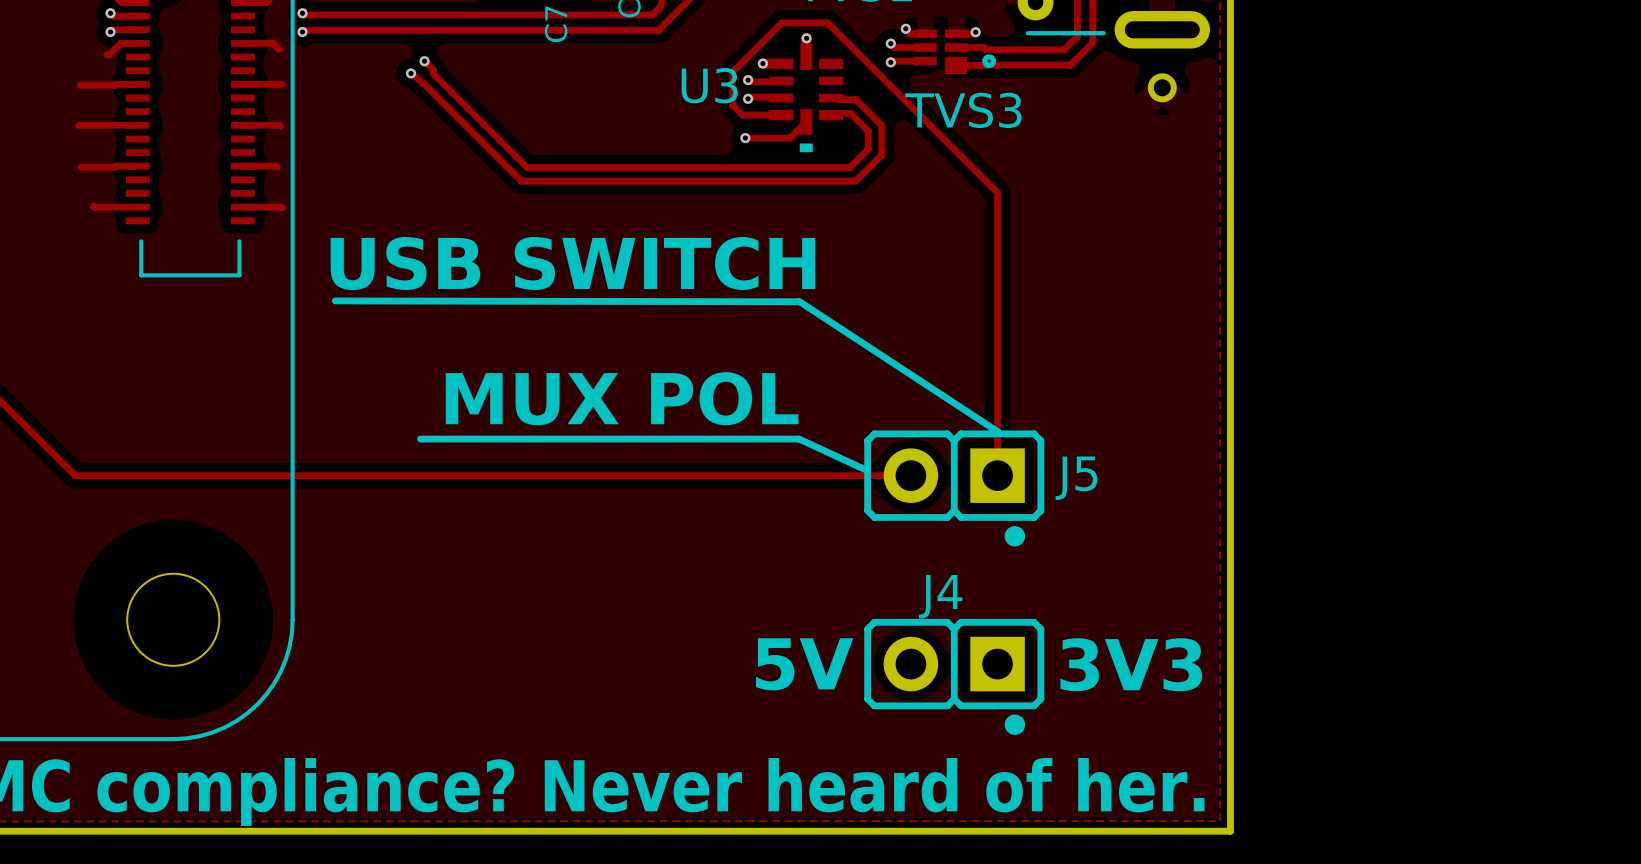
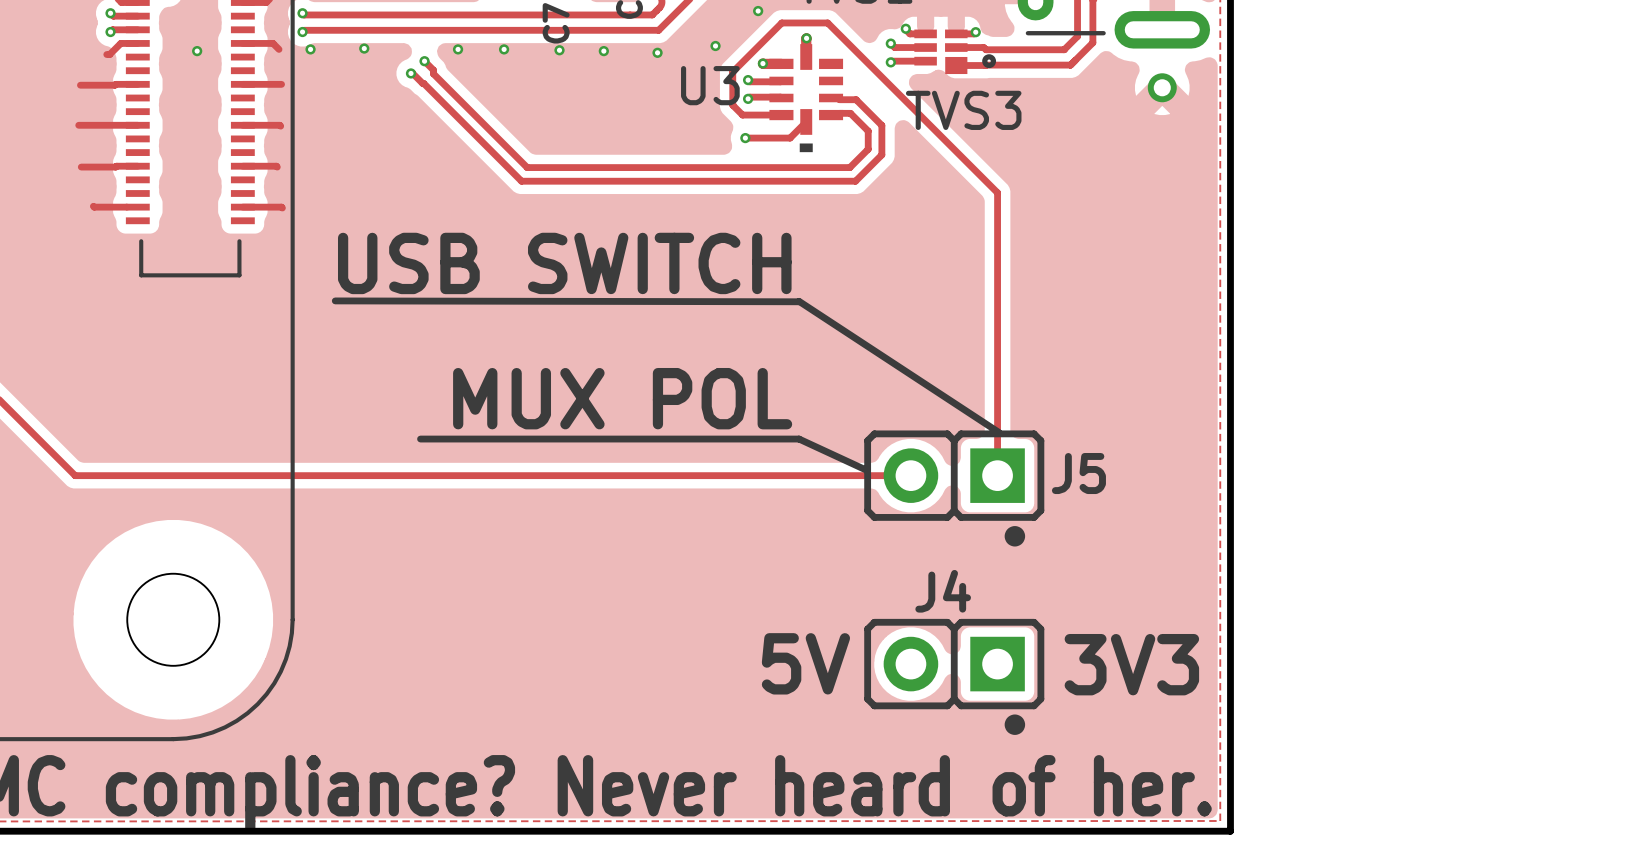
via: none -> (758, 11)
via: none -> (715, 45)
via: none -> (364, 48)
via: none -> (310, 49)
via: none -> (458, 49)
via: none -> (504, 49)
via: none -> (559, 50)
via: none -> (197, 51)
via: none -> (603, 51)
via: none -> (657, 52)

